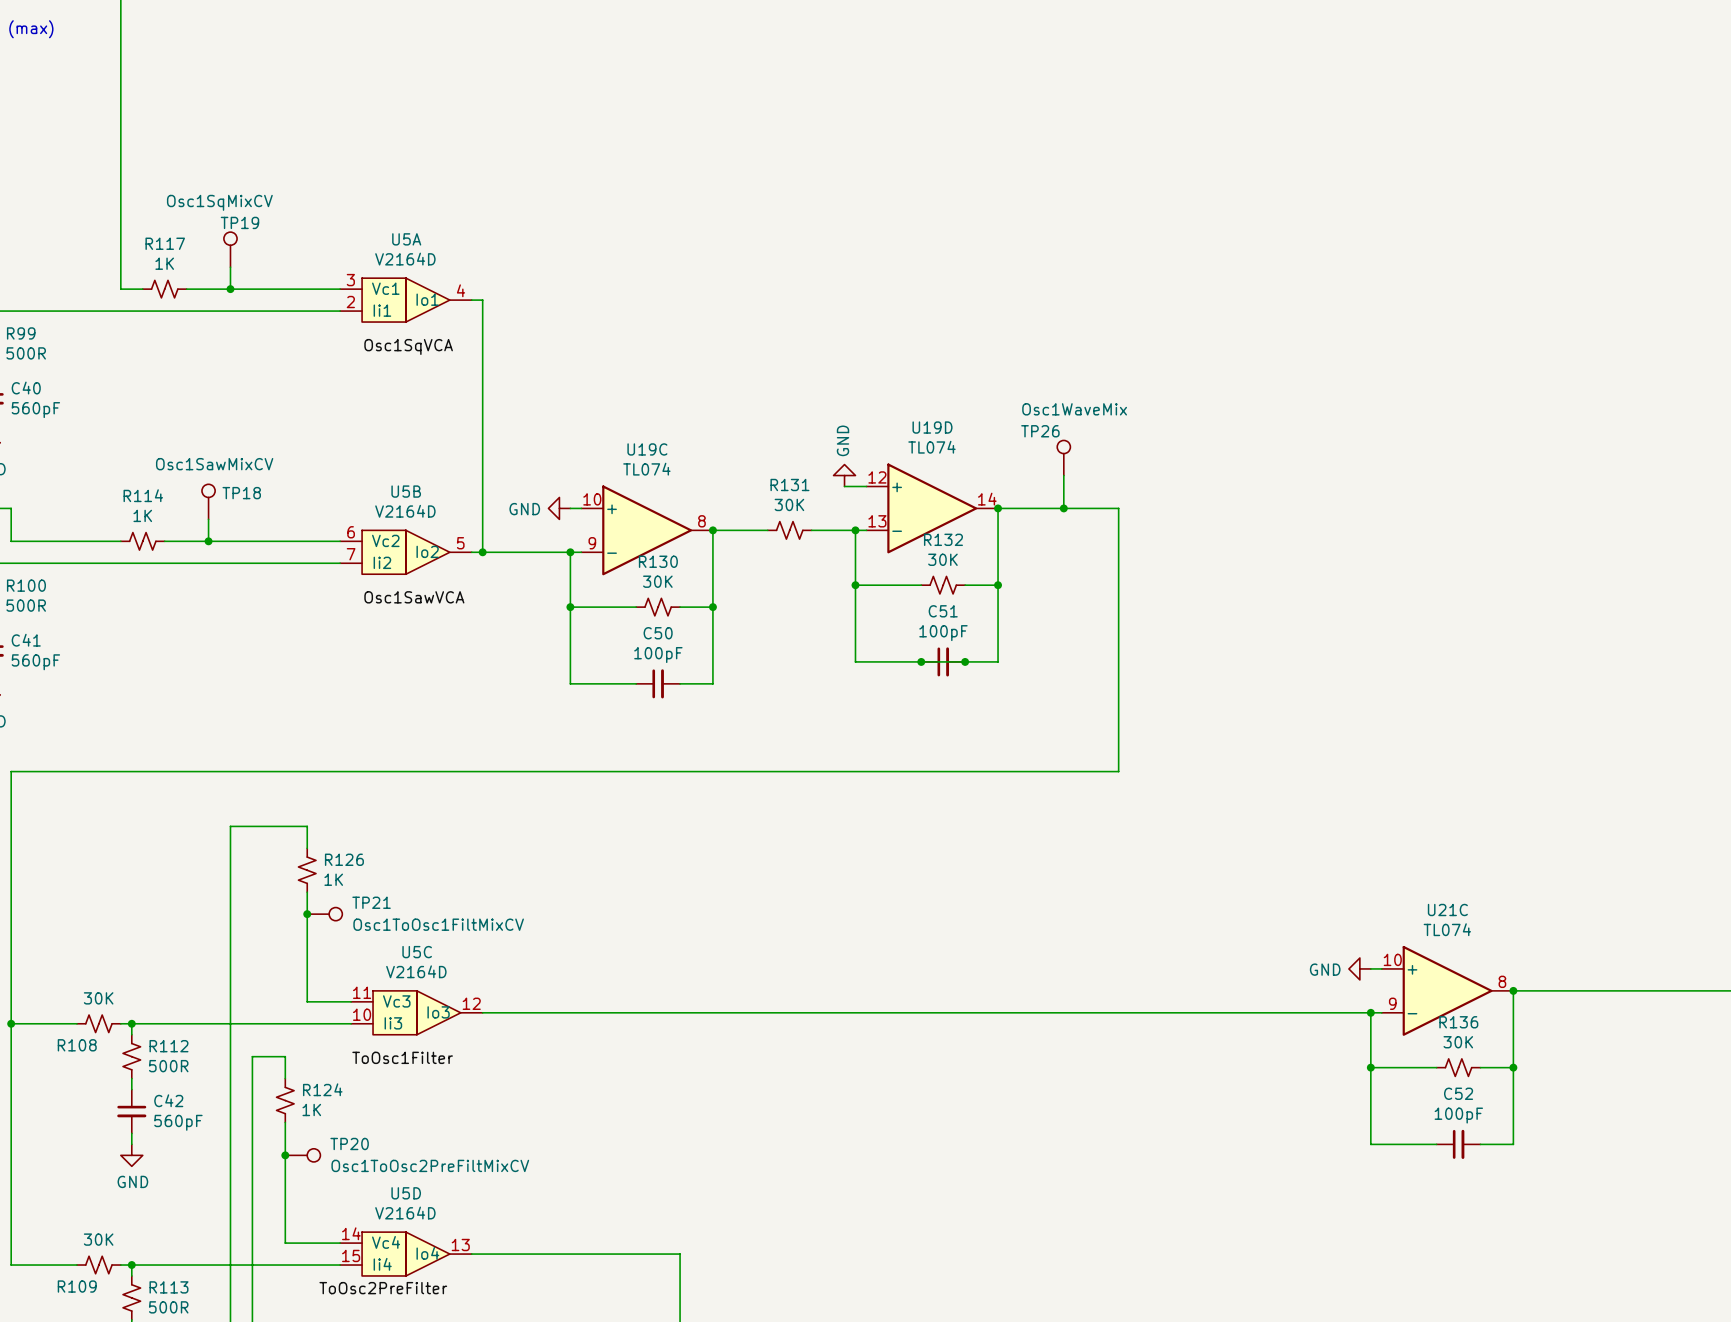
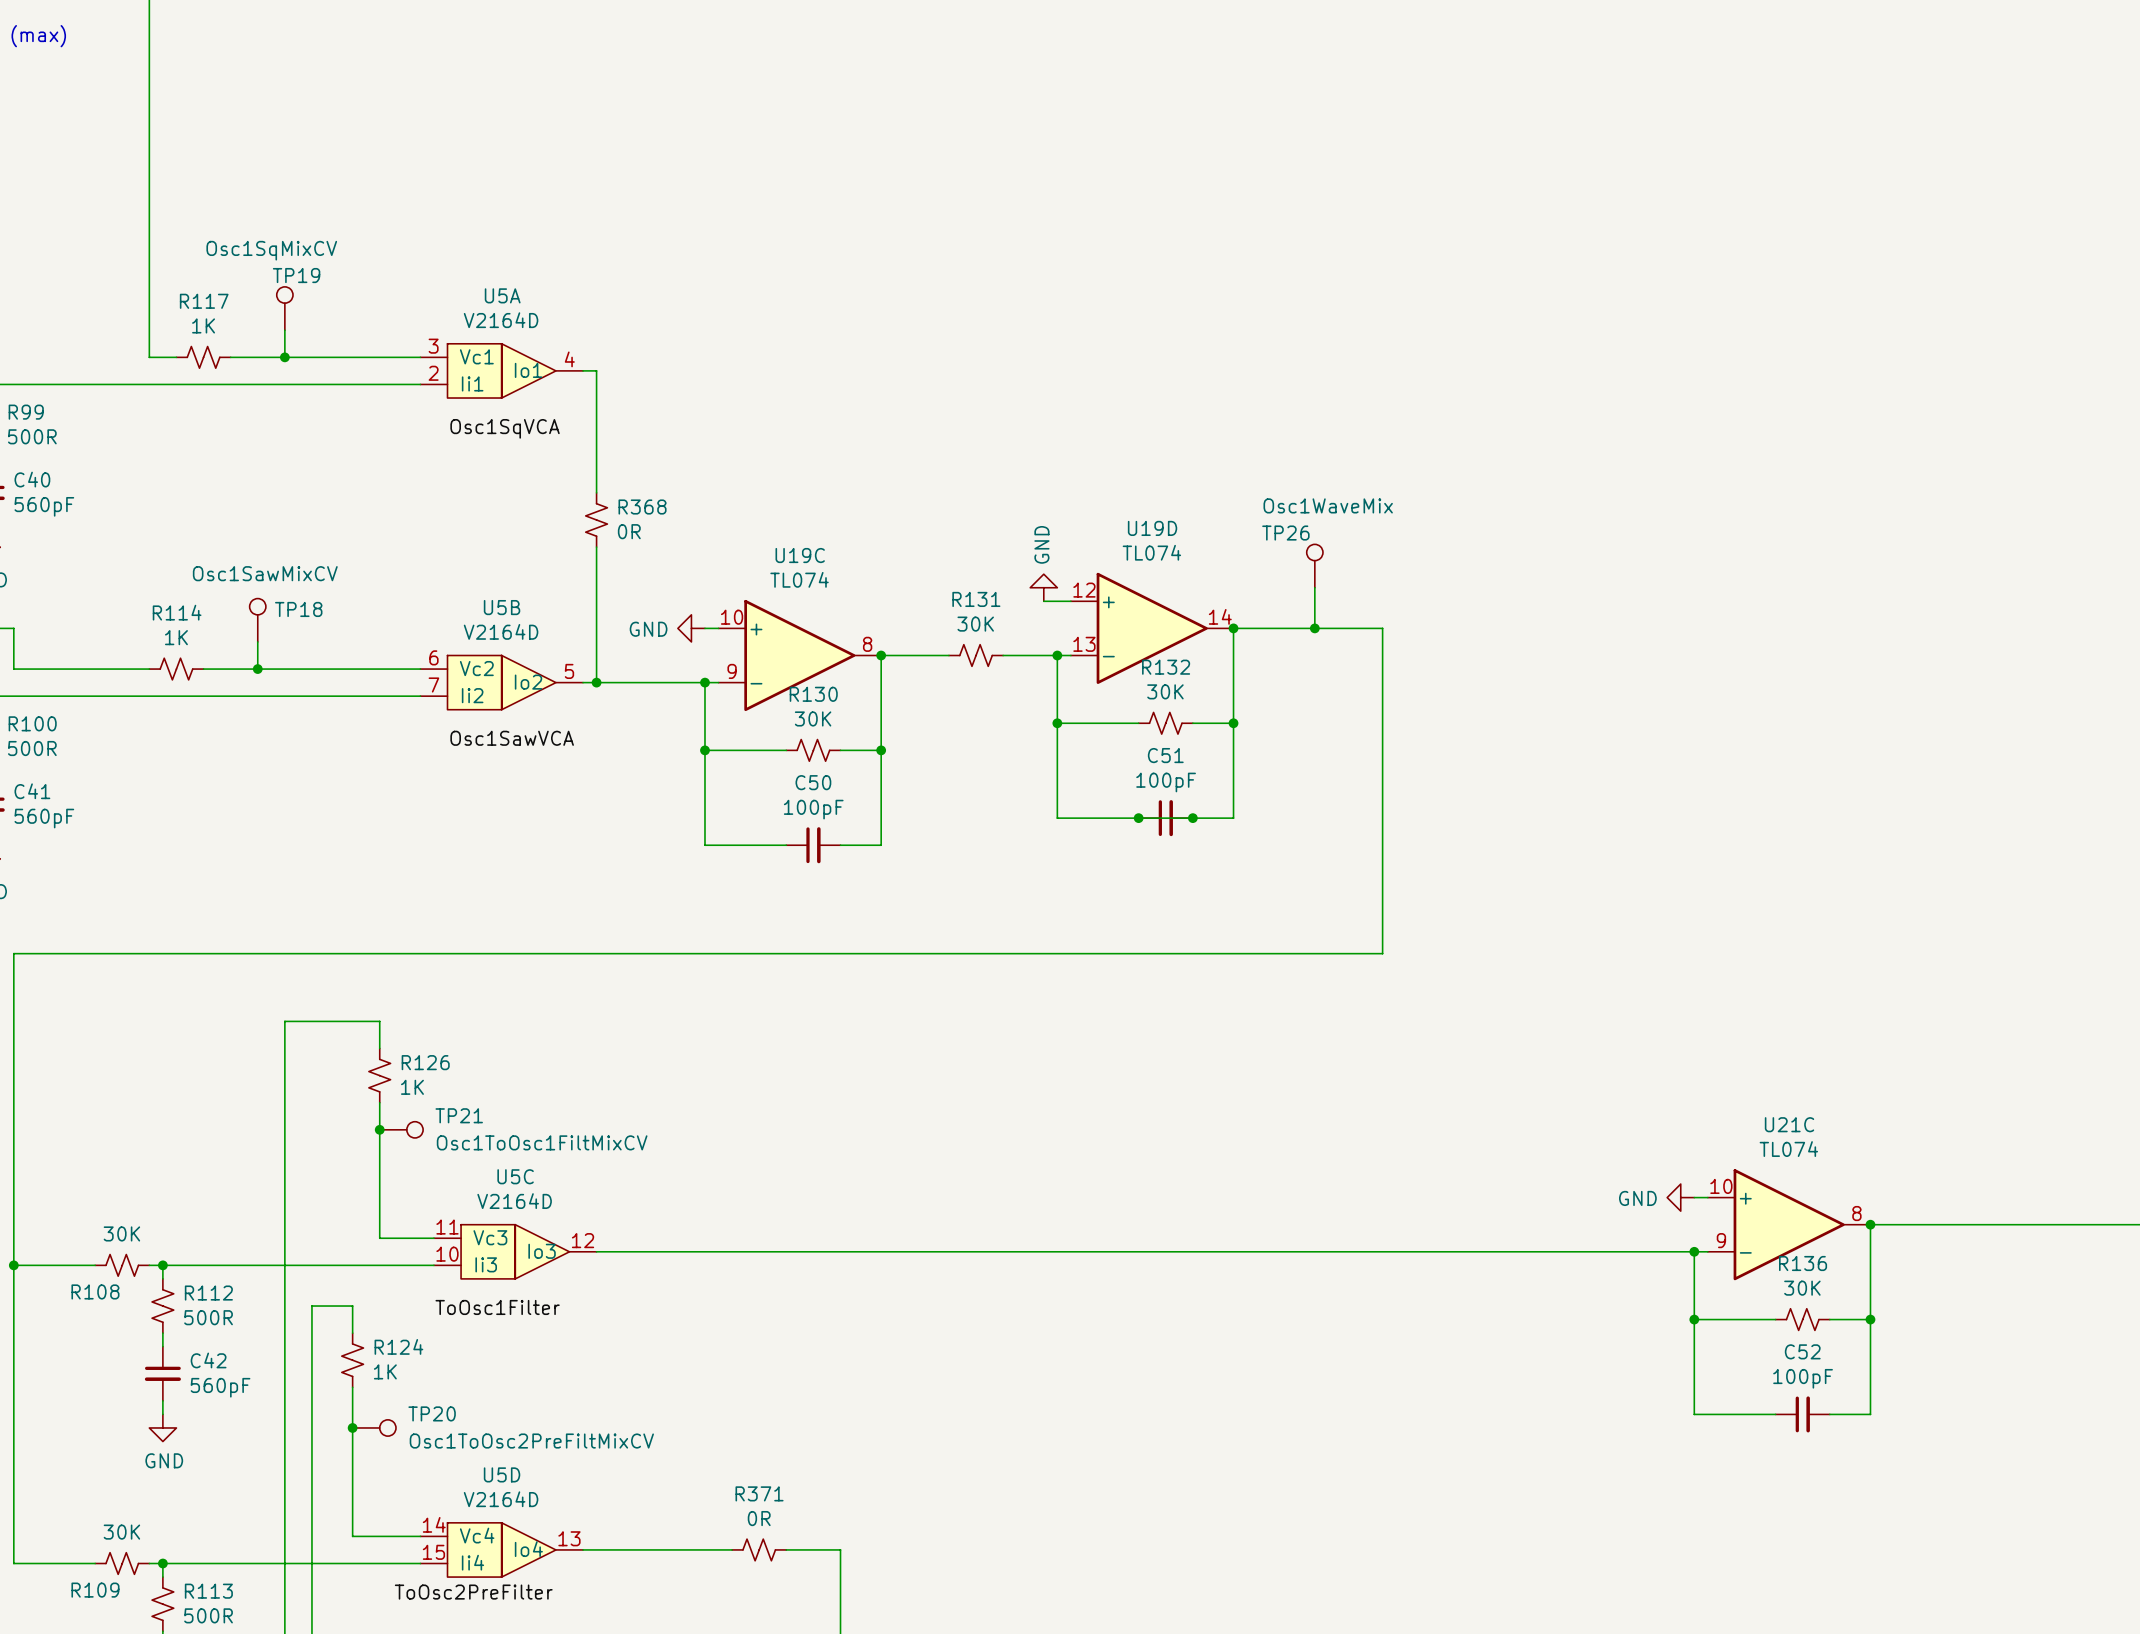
R368: none -> 0R (596, 519)
R371: none -> 0R (759, 1549)

